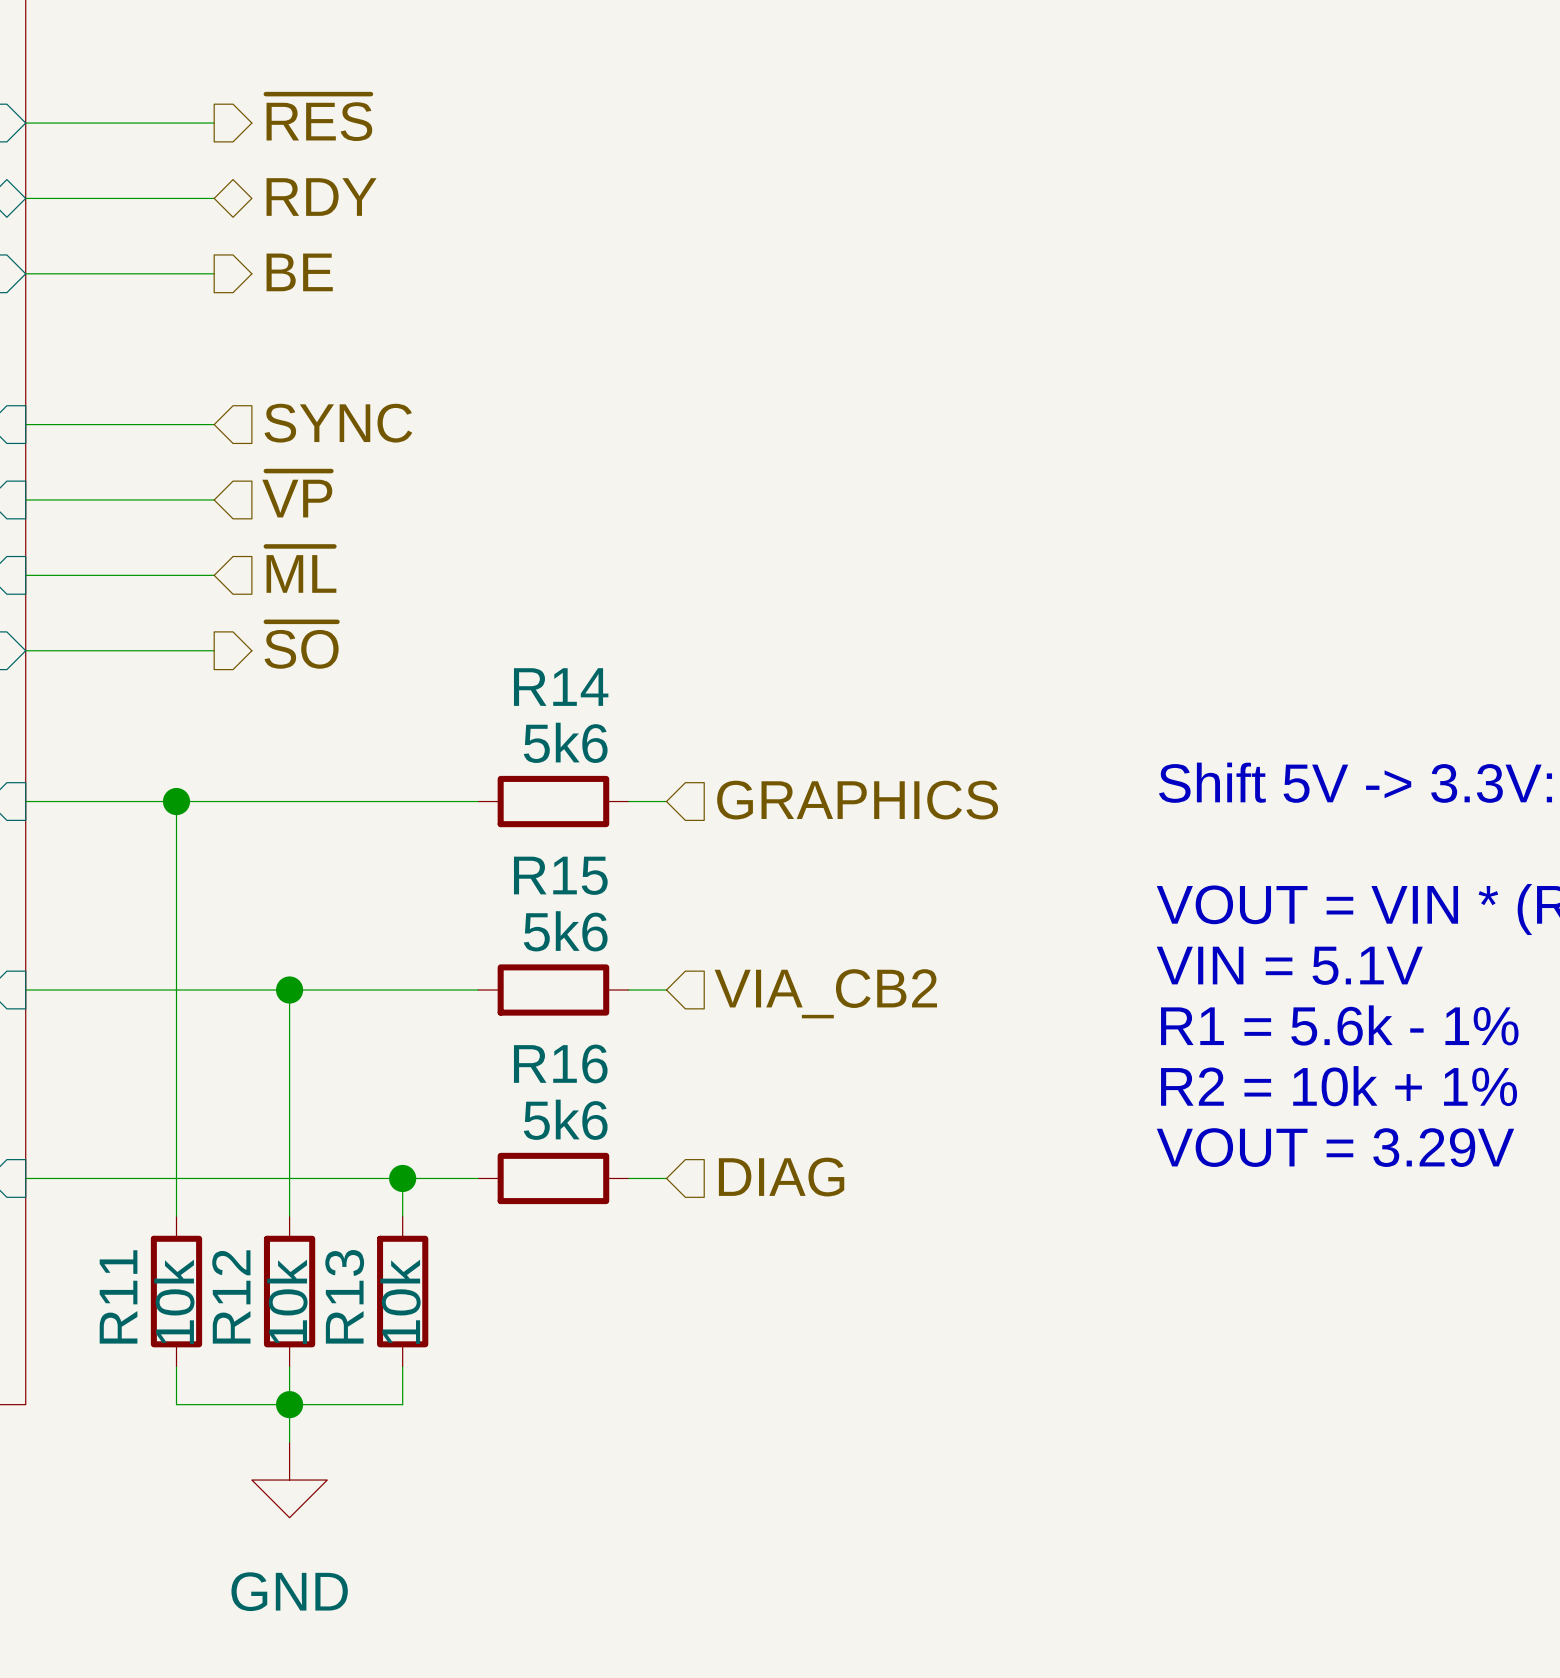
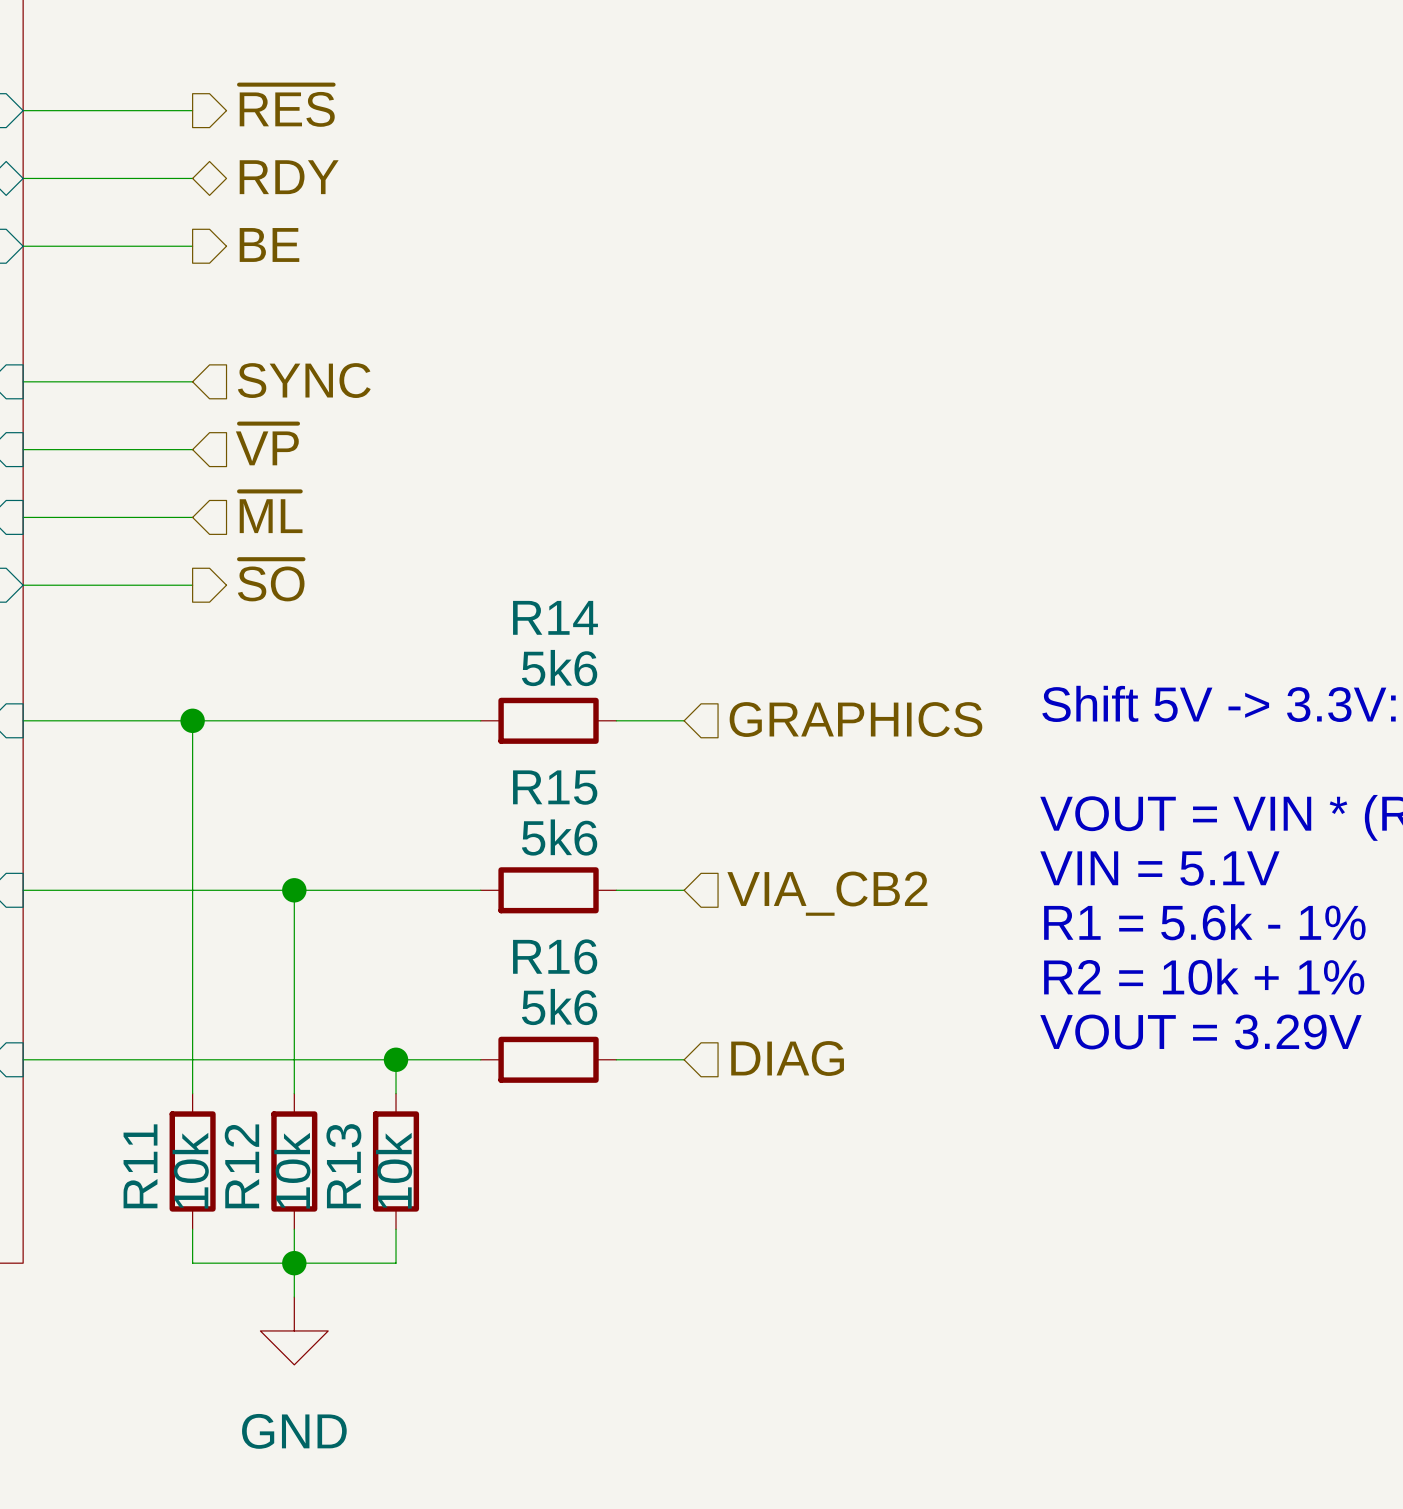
hierarchical label position: GRAPHICS (857, 800) -> GRAPHICS (855, 719)
wire: (176, 801) (176, 1216) -> (192, 720) (192, 1093)
junction position: (176, 801) -> (192, 720)
wire: none -> (429, 720) (480, 720)
R14 position: (553, 801) -> (548, 720)
wire: (628, 801) (666, 801) -> none
wire: none -> (616, 720) (684, 720)
wire: (289, 990) (289, 1216) -> (294, 890) (294, 1093)
junction position: (289, 990) -> (294, 890)
wire: none -> (429, 890) (480, 890)
R15 position: (553, 990) -> (548, 890)
wire: (628, 990) (666, 990) -> none
wire: none -> (616, 890) (684, 890)
hierarchical label position: VIA_CB2 (825, 993) -> VIA_CB2 (827, 893)
hierarchical label position: DIAG (781, 1177) -> DIAG (787, 1058)
wire: (402, 1178) (402, 1216) -> (396, 1059) (396, 1093)
junction position: (402, 1178) -> (396, 1059)
wire: none -> (429, 1059) (480, 1059)
R16 position: (553, 1178) -> (548, 1059)
wire: (628, 1178) (666, 1178) -> none
wire: none -> (616, 1059) (684, 1059)
R11 position: (176, 1291) -> (192, 1161)
R12 position: (289, 1291) -> (294, 1161)
R13 position: (402, 1291) -> (396, 1161)
wire: (176, 1366) (176, 1404) (214, 1404) -> (192, 1229) (192, 1263)
wire: (289, 1366) (289, 1442) -> (294, 1229) (294, 1297)
wire: (402, 1366) (402, 1404) -> (396, 1229) (396, 1263) (362, 1263)
junction position: (289, 1404) -> (294, 1263)
power symbol position: GND (289, 1480) -> GND (294, 1330)

